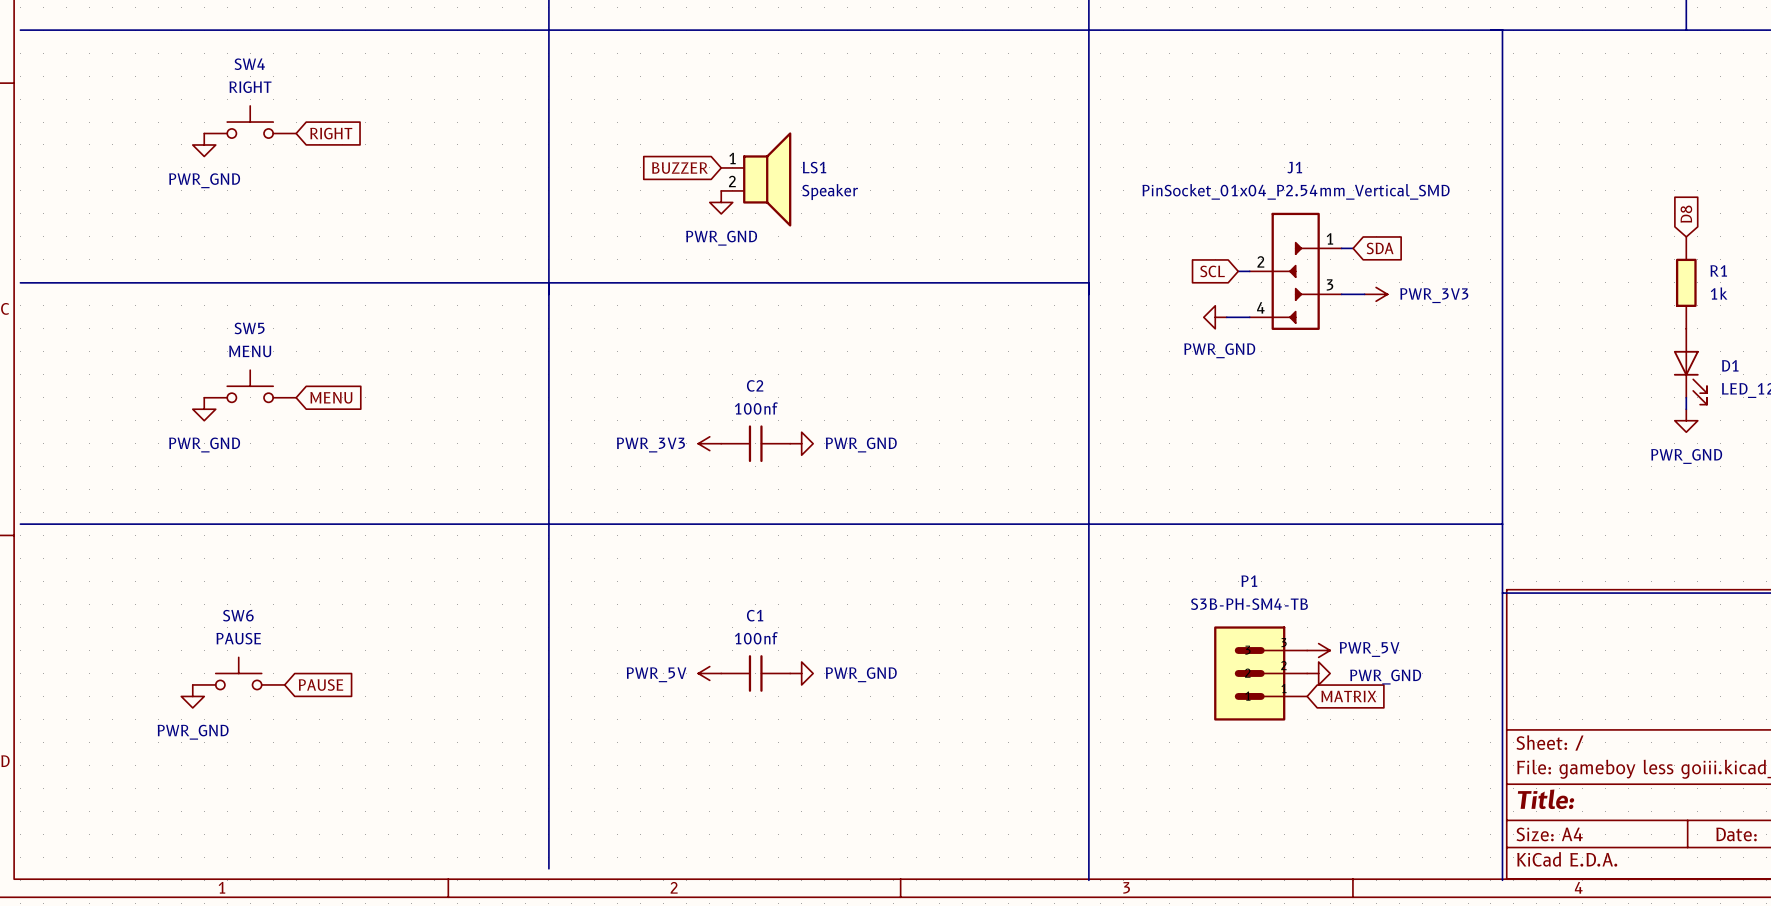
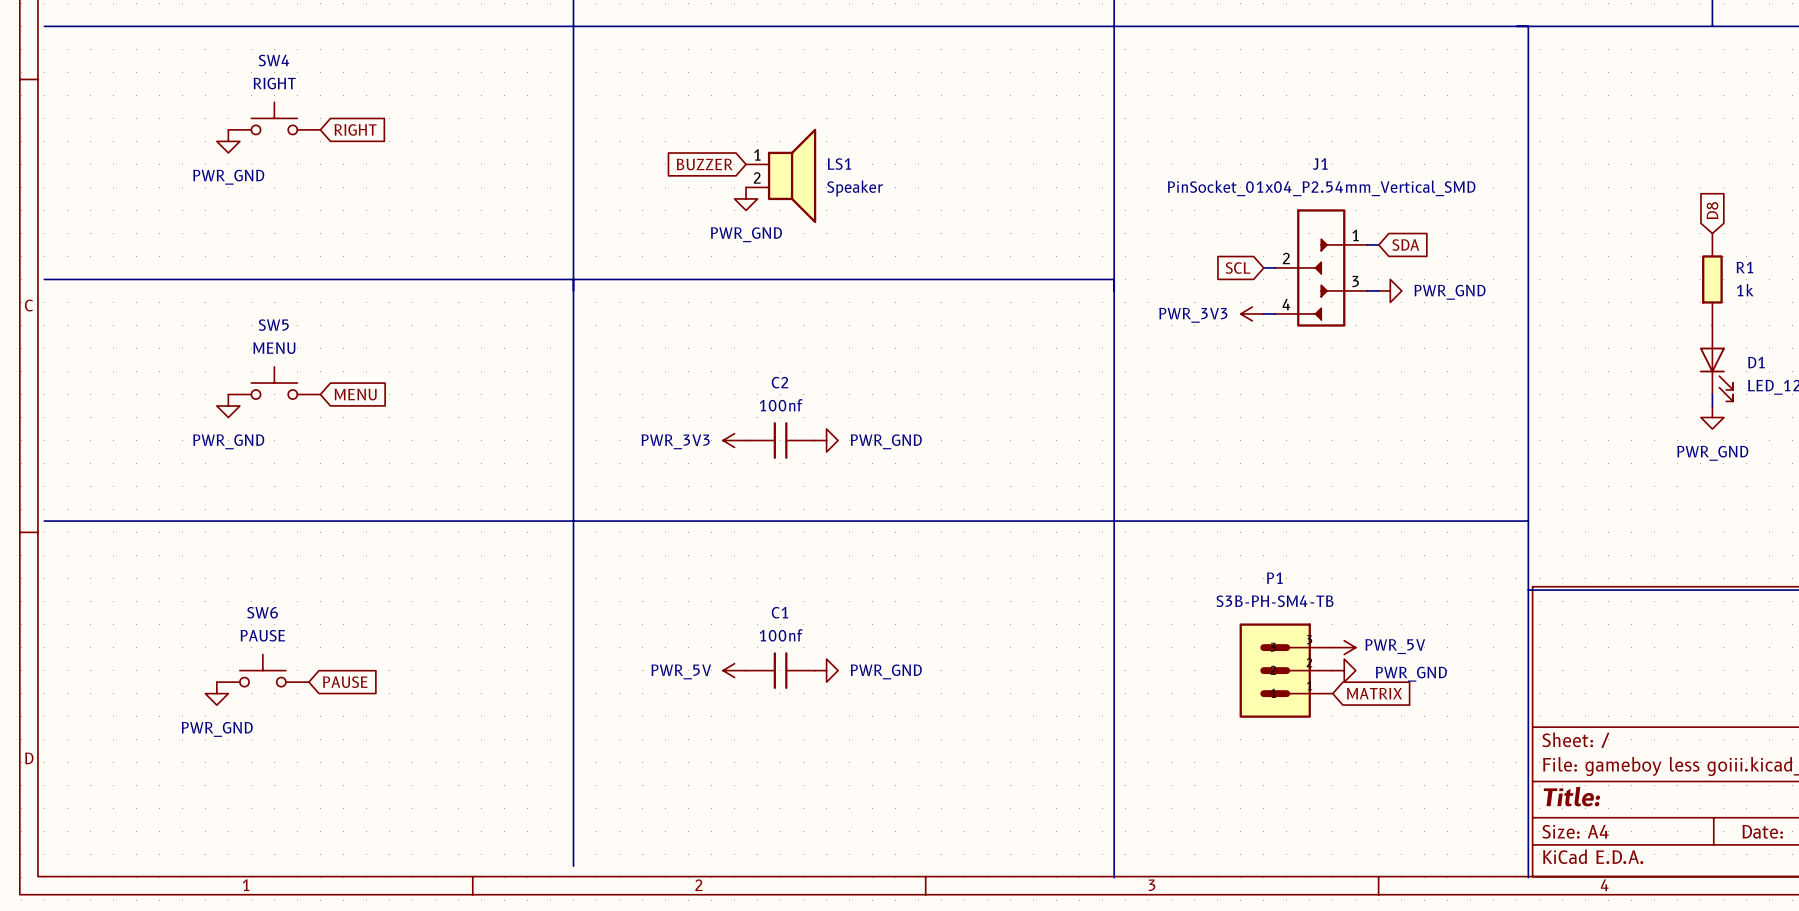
power symbol rotation: 0° (1376, 294) -> 180° (1252, 313)
power symbol position: PWR_3V3 (1376, 294) -> PWR_3V3 (1252, 313)
power symbol rotation: 0° (1215, 317) -> 180° (1390, 290)
power symbol position: PWR_GND (1215, 317) -> PWR_GND (1390, 290)
power symbol text position: PWR_GND (1219, 350) -> PWR_GND (1449, 292)

